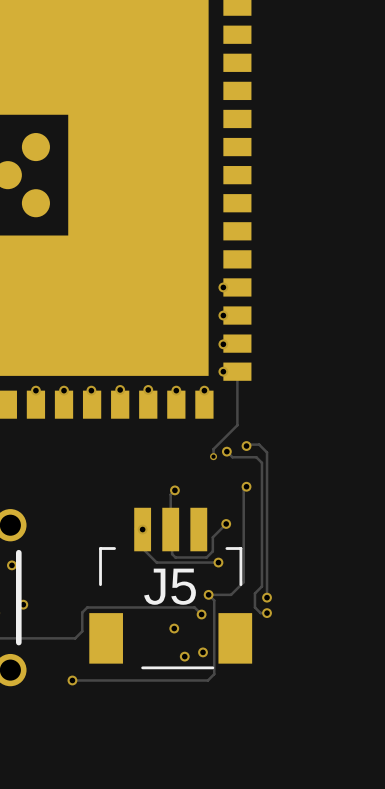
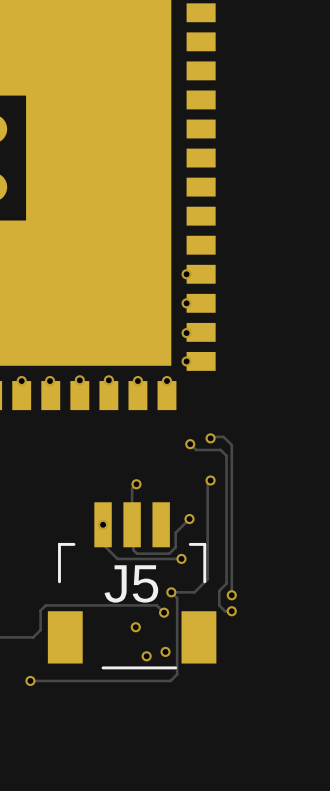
track: (237, 371) (237, 425) (213, 449) (213, 457) -> none
via: (213, 456) -> none

